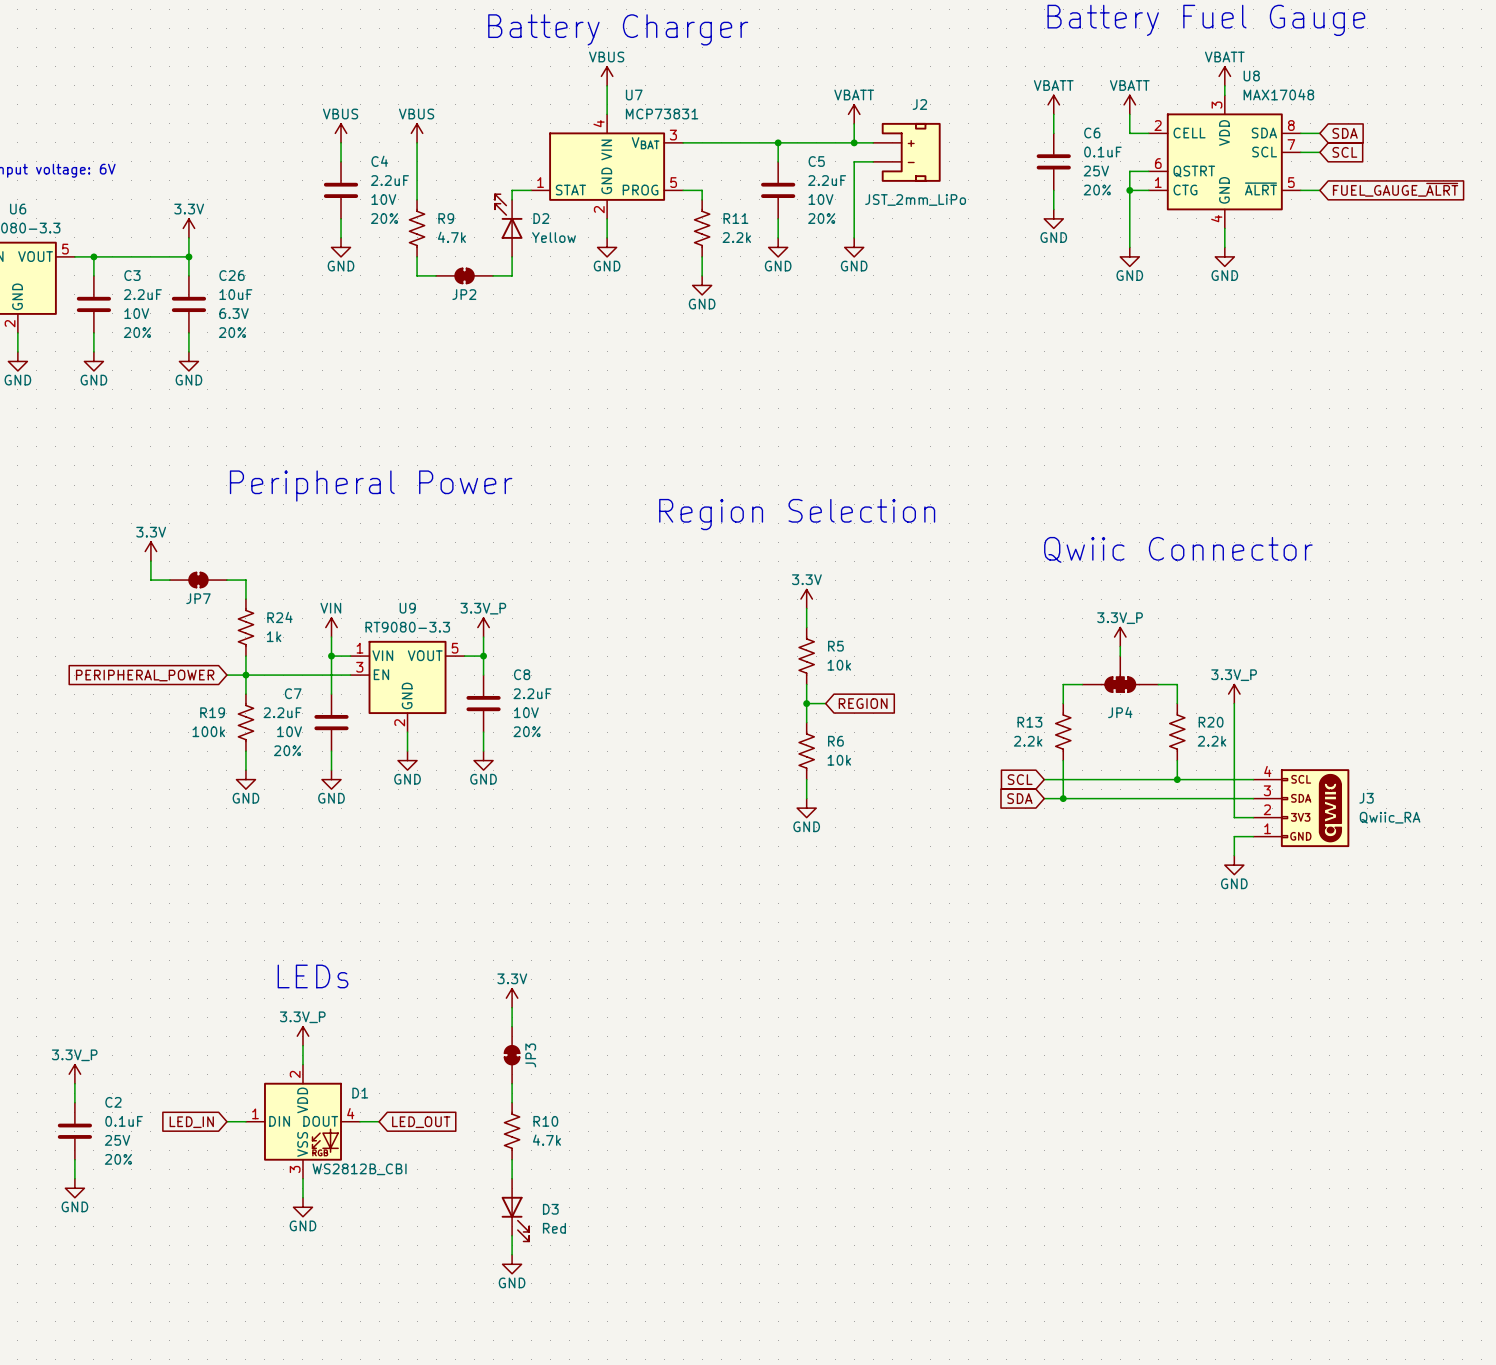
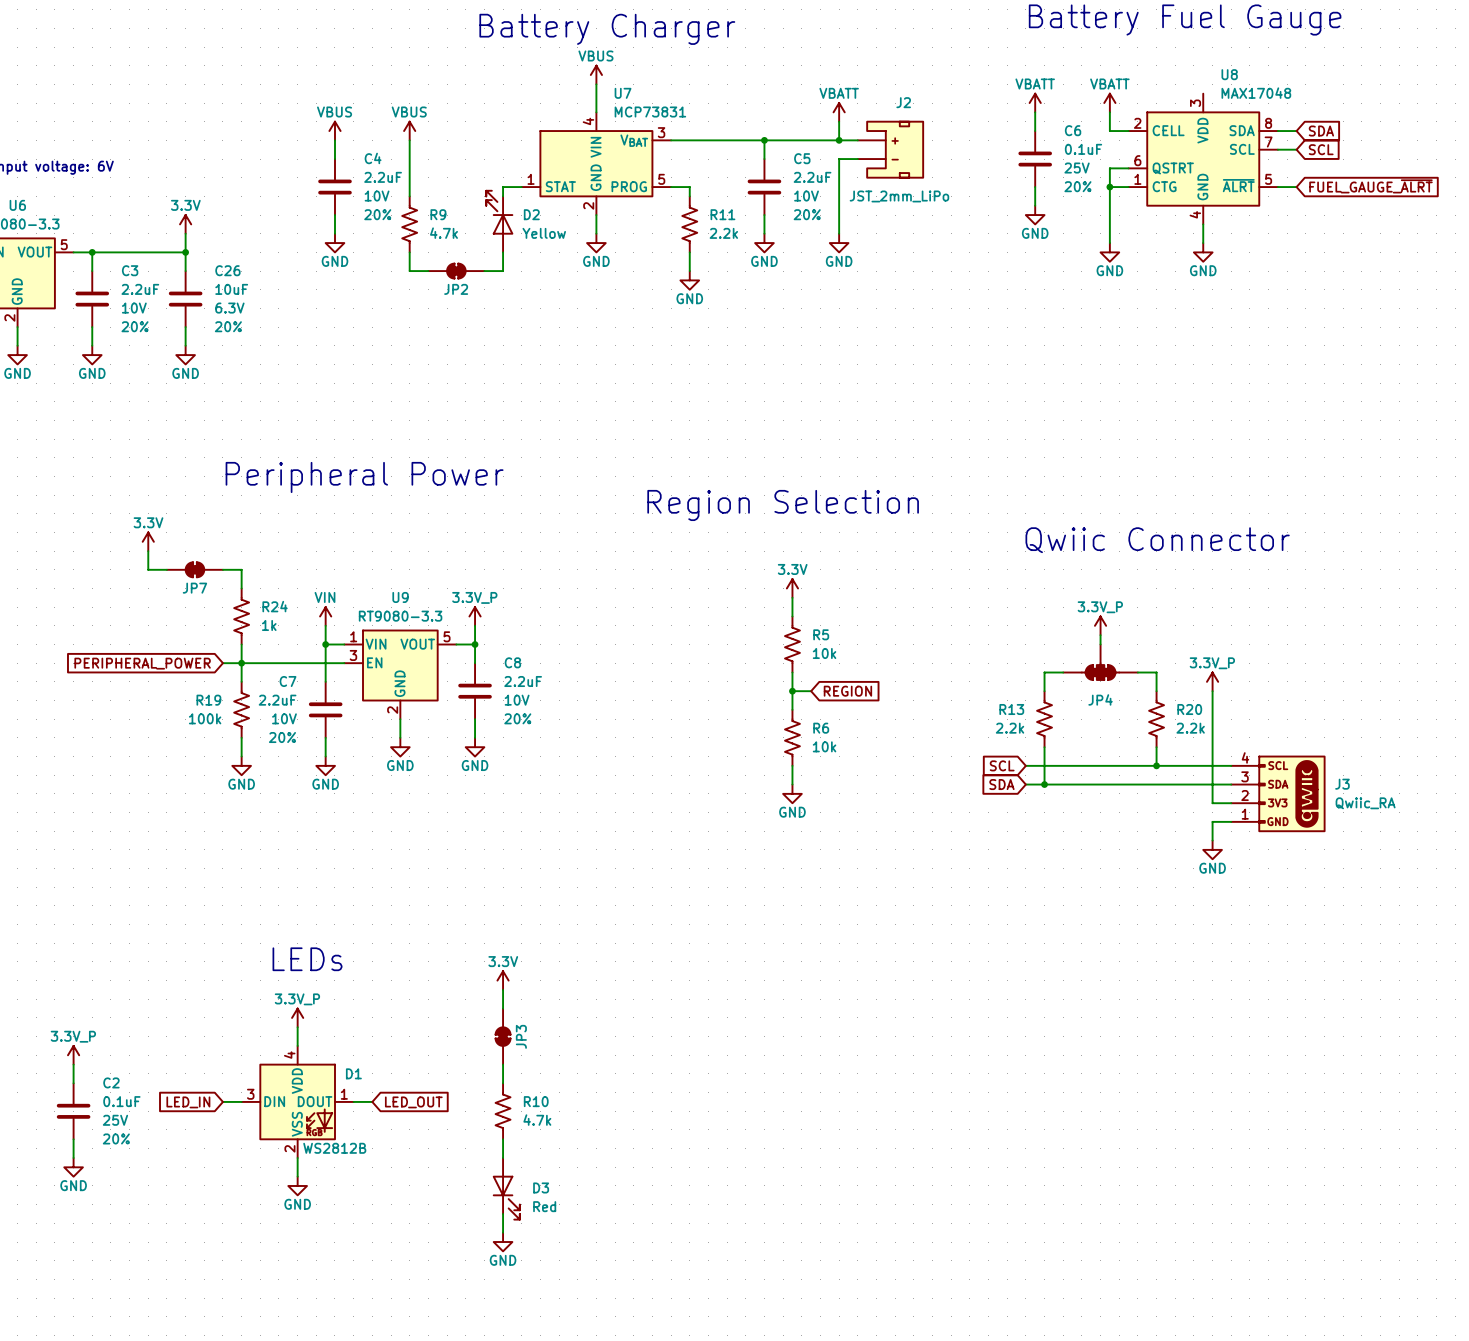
power symbol: VBATT (1224, 76) -> none
wire: (1224, 85) (1224, 95) -> none
D1 pin number: 2 (295, 1074) -> 4 (289, 1055)
D1 pin number: 1 (255, 1113) -> 3 (250, 1094)
D1 pin number: 4 (350, 1113) -> 1 (344, 1094)
D1 pin number: 3 (295, 1169) -> 2 (289, 1148)
D1 value: WS2812B_CBI (359, 1169) -> WS2812B (334, 1148)

